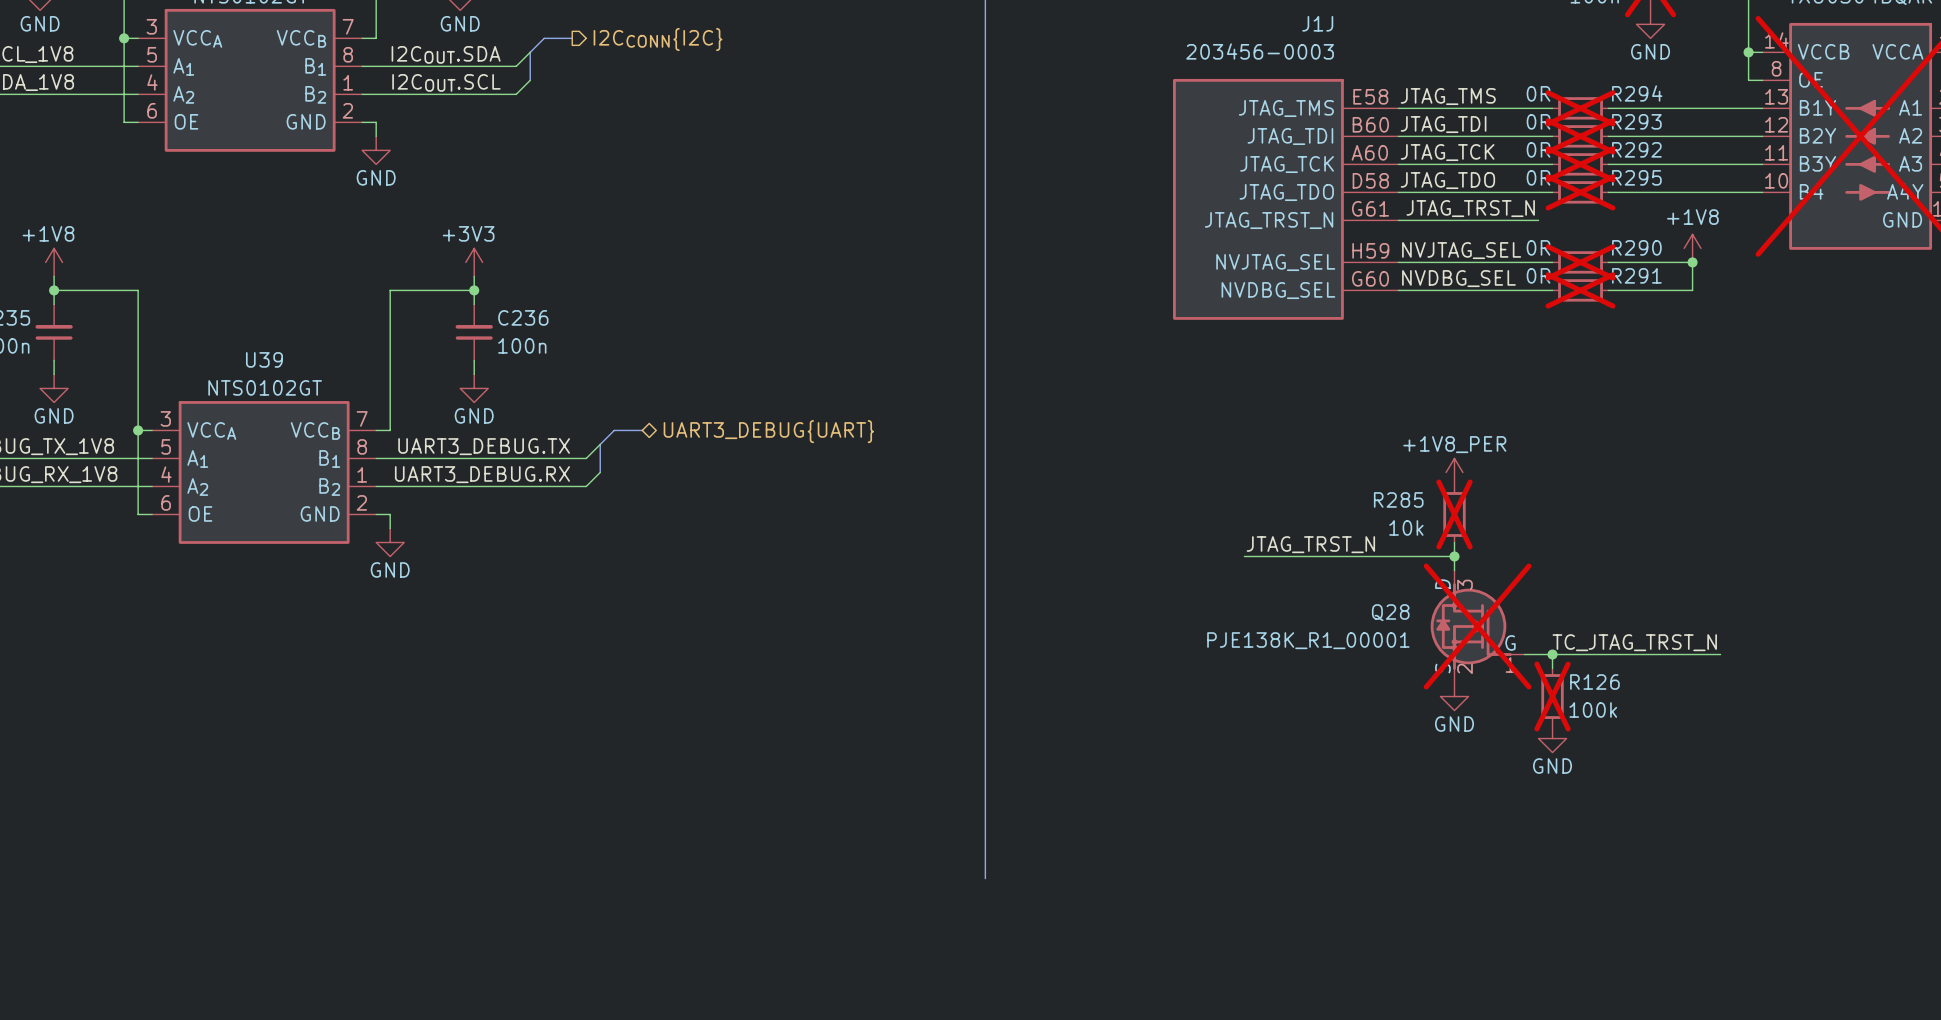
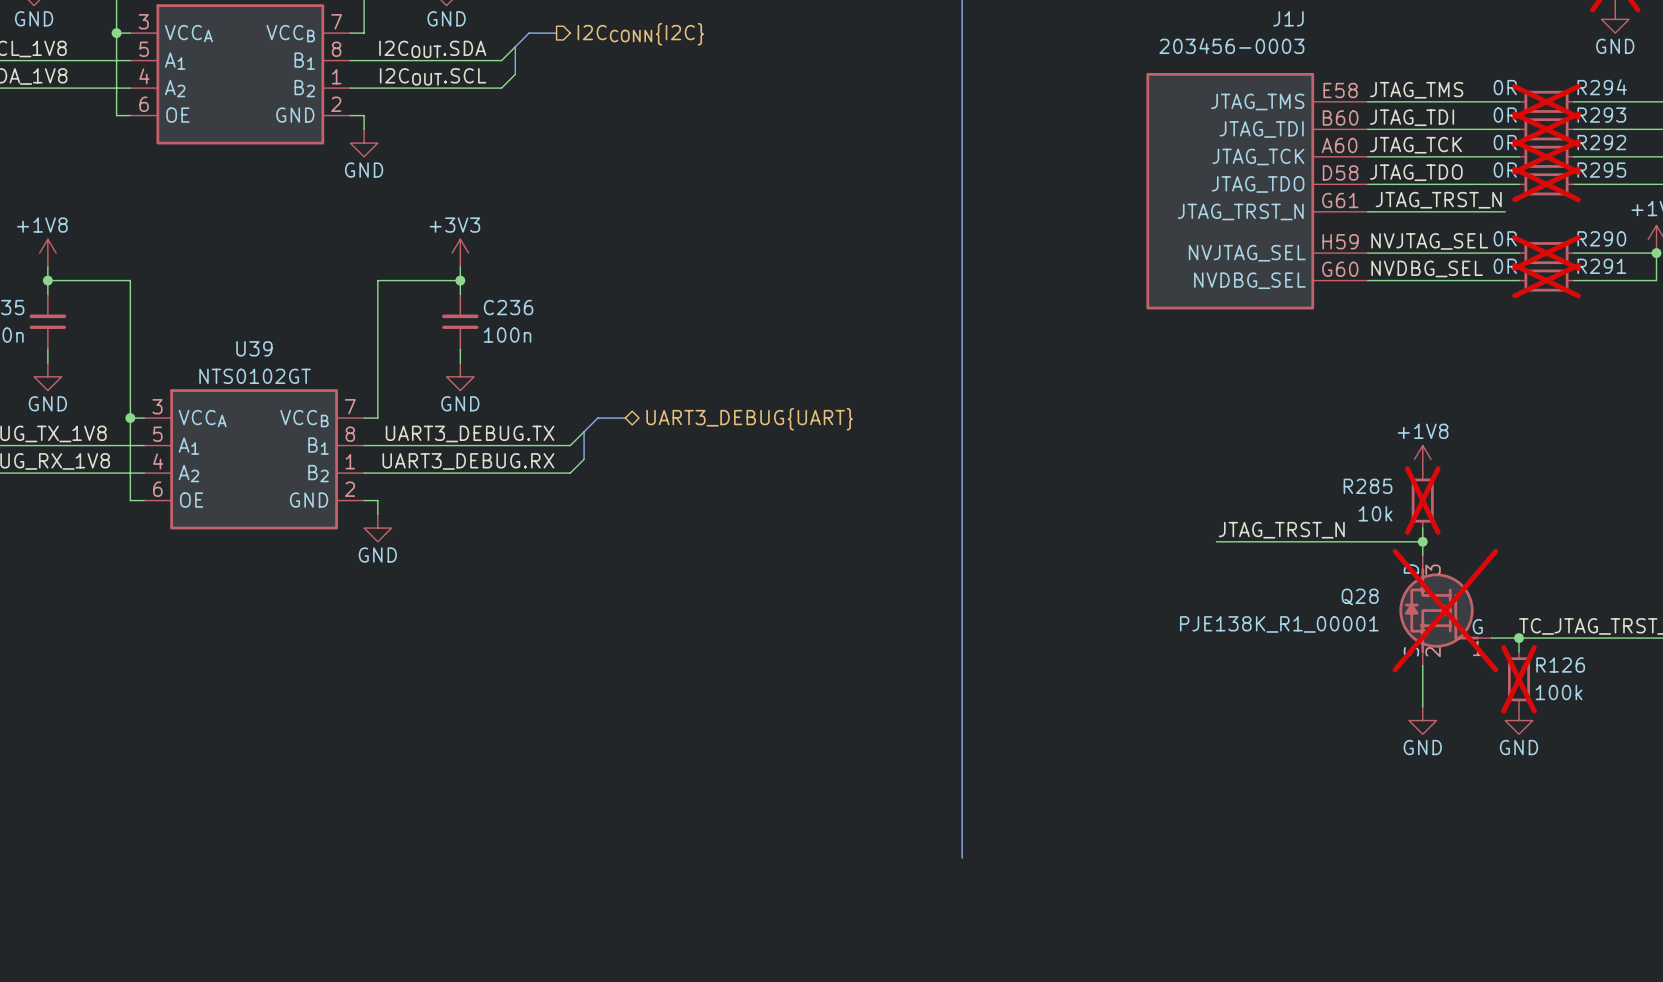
power symbol: +1V8_PER (1454, 472) -> +1V8 (1422, 459)
wire: none -> (1422, 665) (1422, 706)
power symbol position: GND (1454, 696) -> GND (1422, 720)

